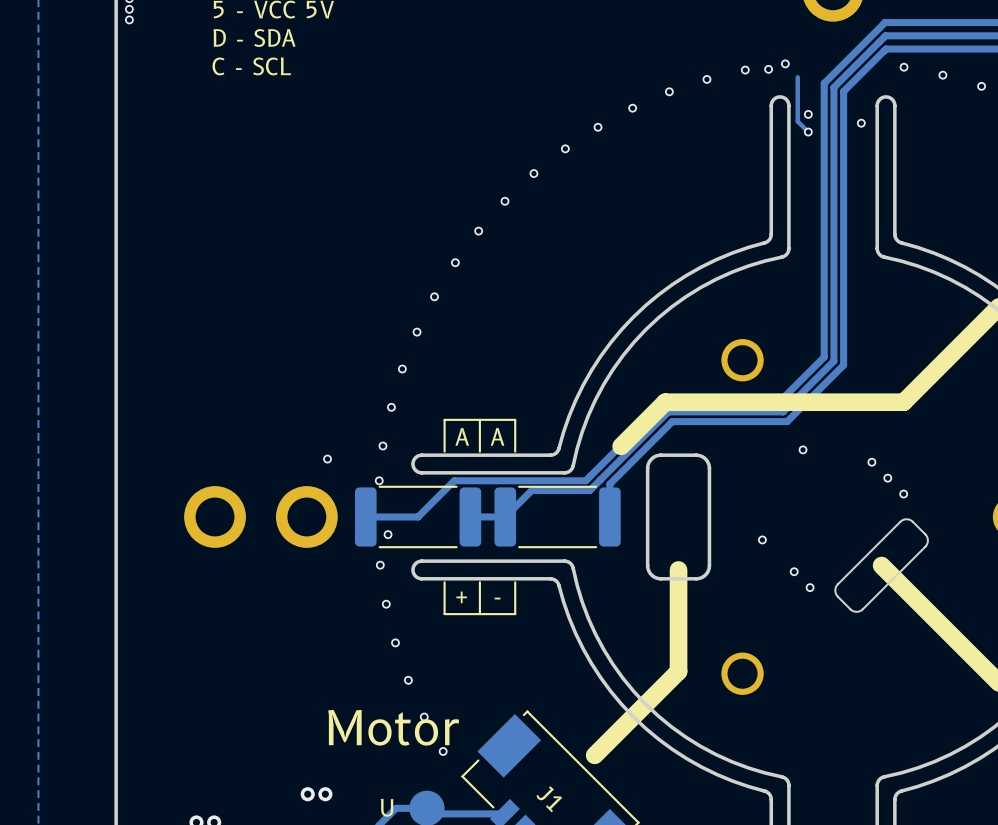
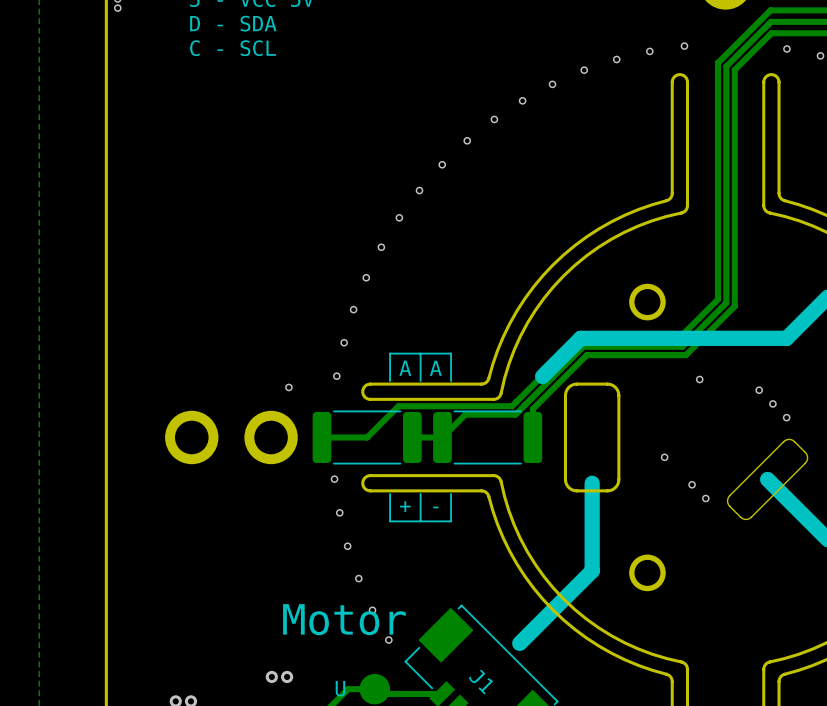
via: (768, 69) -> none
track: (797, 77) (797, 121) (808, 132) -> none
via: (808, 114) -> none
via: (861, 123) -> none
via: (808, 132) -> none
via: (379, 480) -> none
via: (388, 534) -> none

